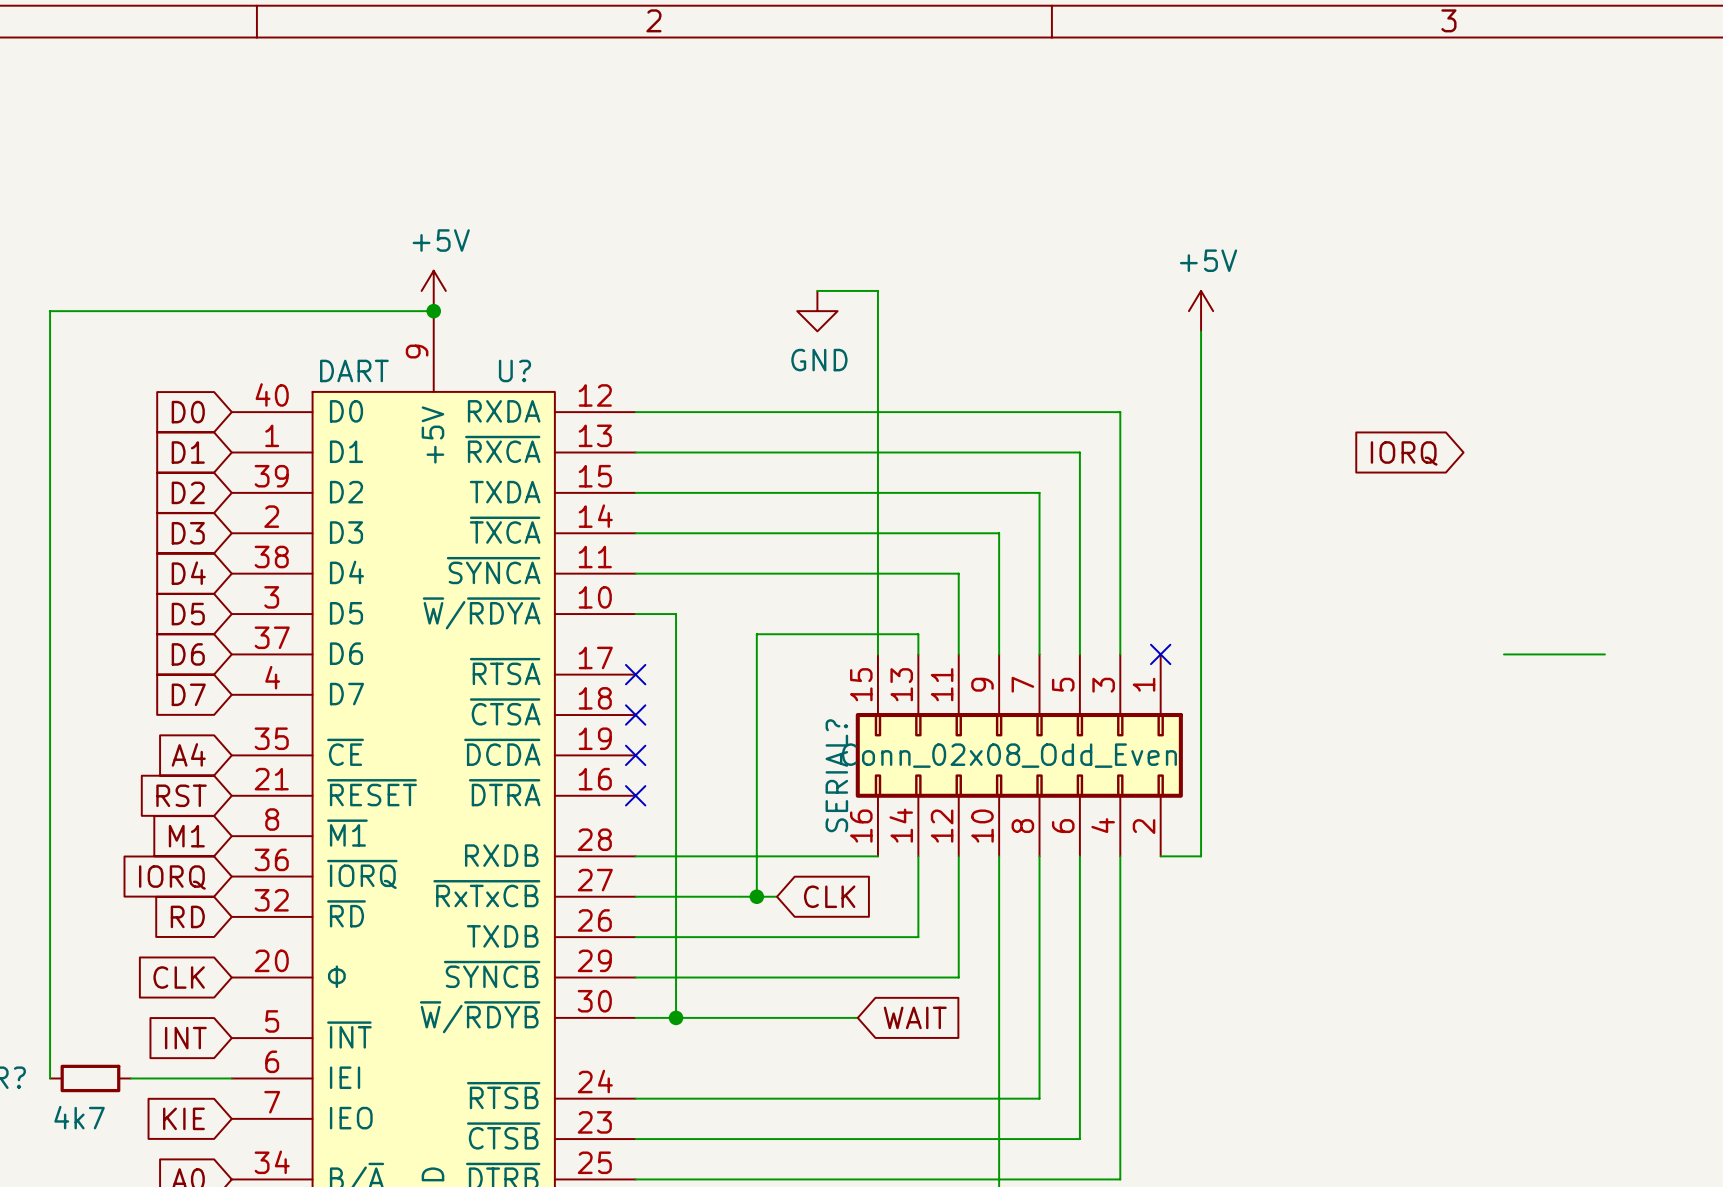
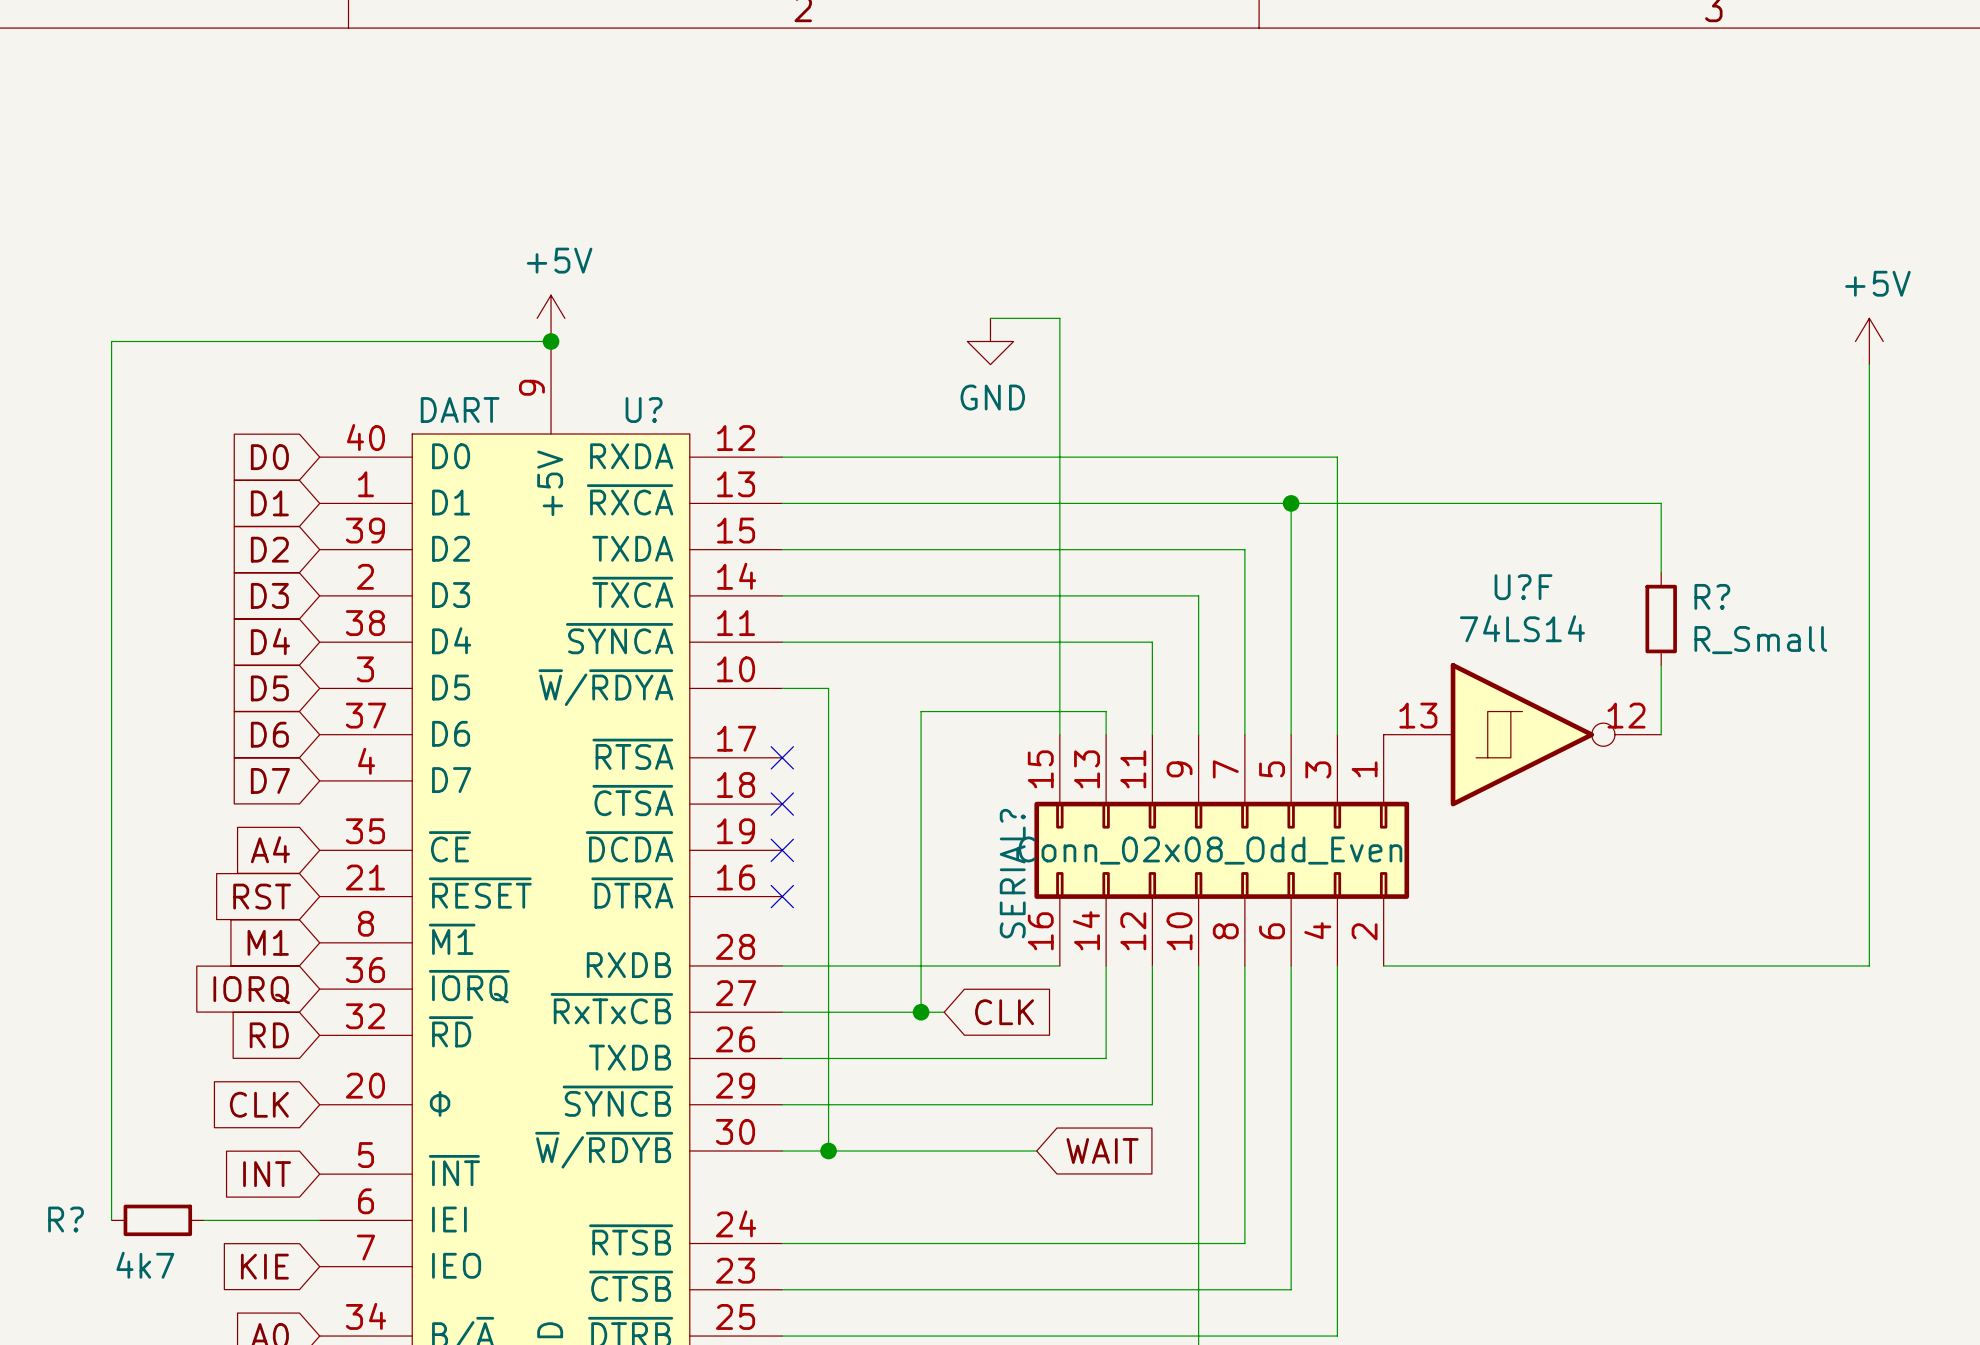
power symbol position: +5V (1201, 311) -> +5V (1869, 341)
wire: (1201, 331) (1201, 856) -> (1869, 364) (1869, 965) (1429, 965)
wire: none -> (1291, 503) (1661, 503) (1661, 572)
junction: none -> (1291, 503)
global label: IORQ (1404, 453) -> none
R?: none -> R_Small (1661, 619)
wire: none -> (1661, 665) (1661, 734)
no-connect mark: (1160, 654) -> none
U?F: none -> 74LS14 (1522, 734)
wire: (1503, 654) (1604, 654) -> none

